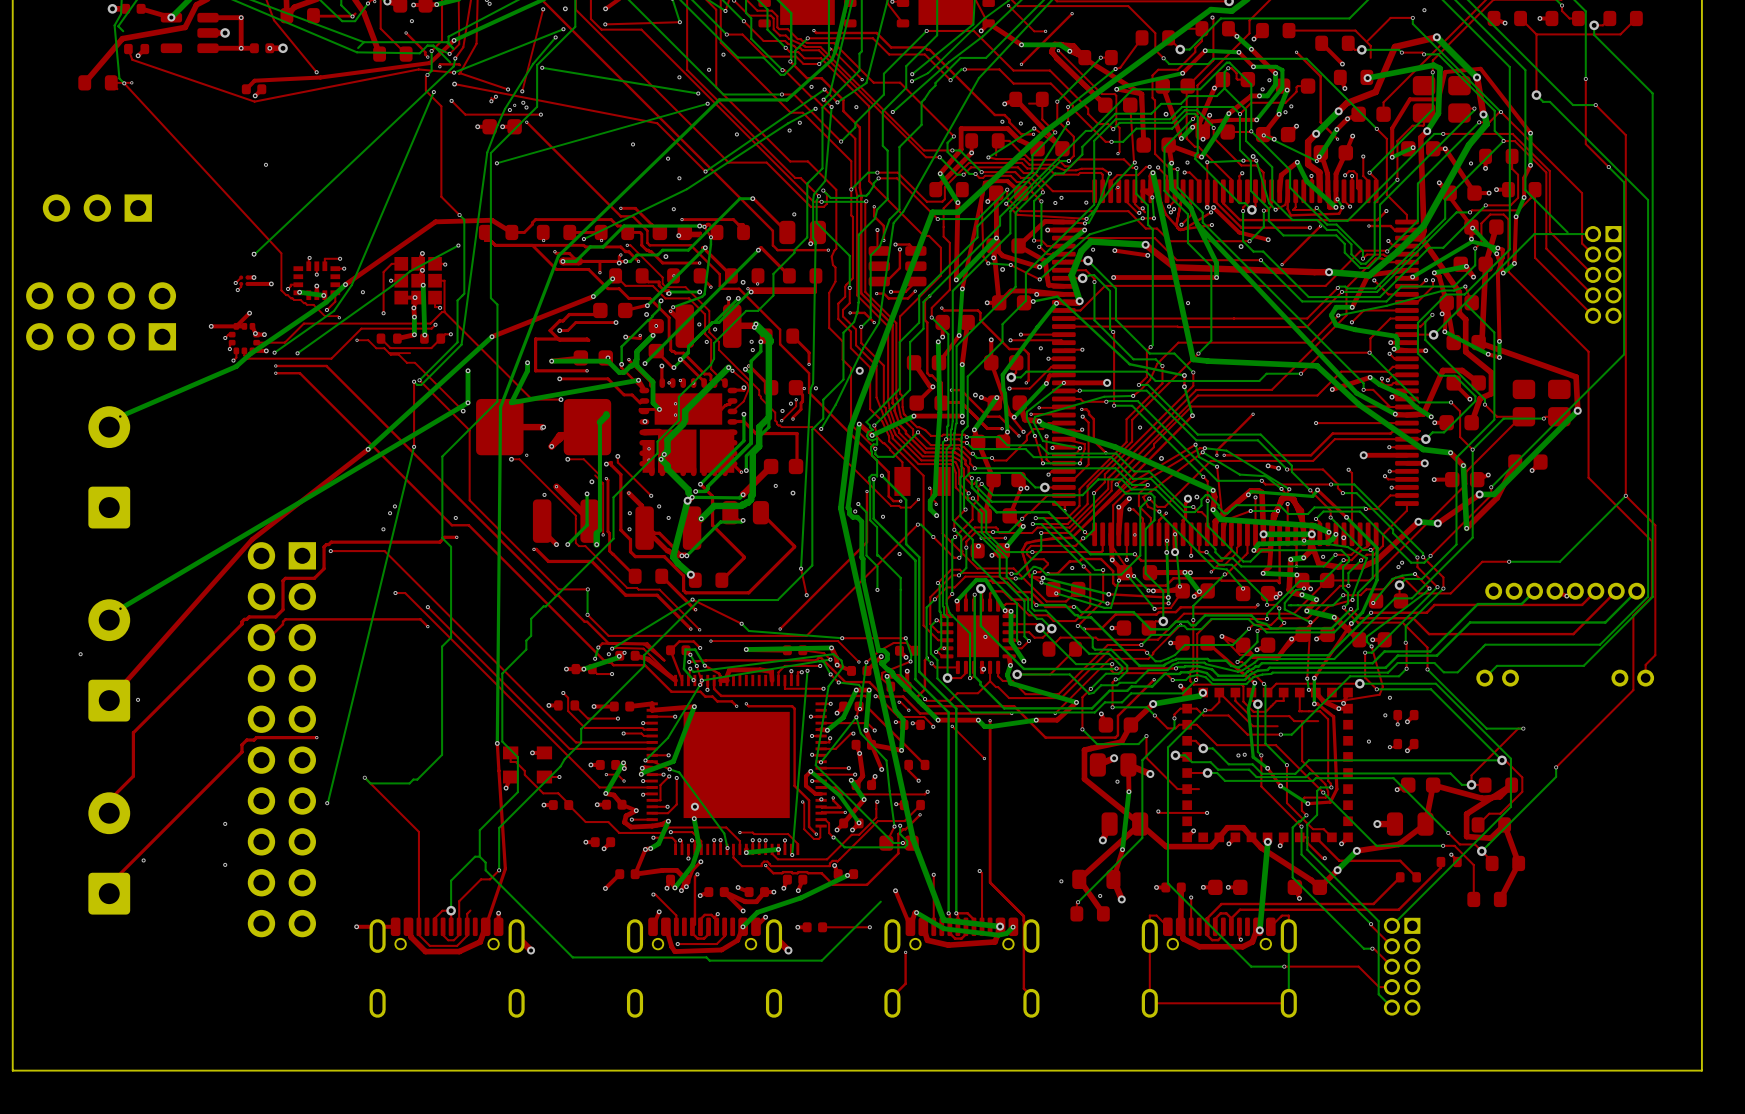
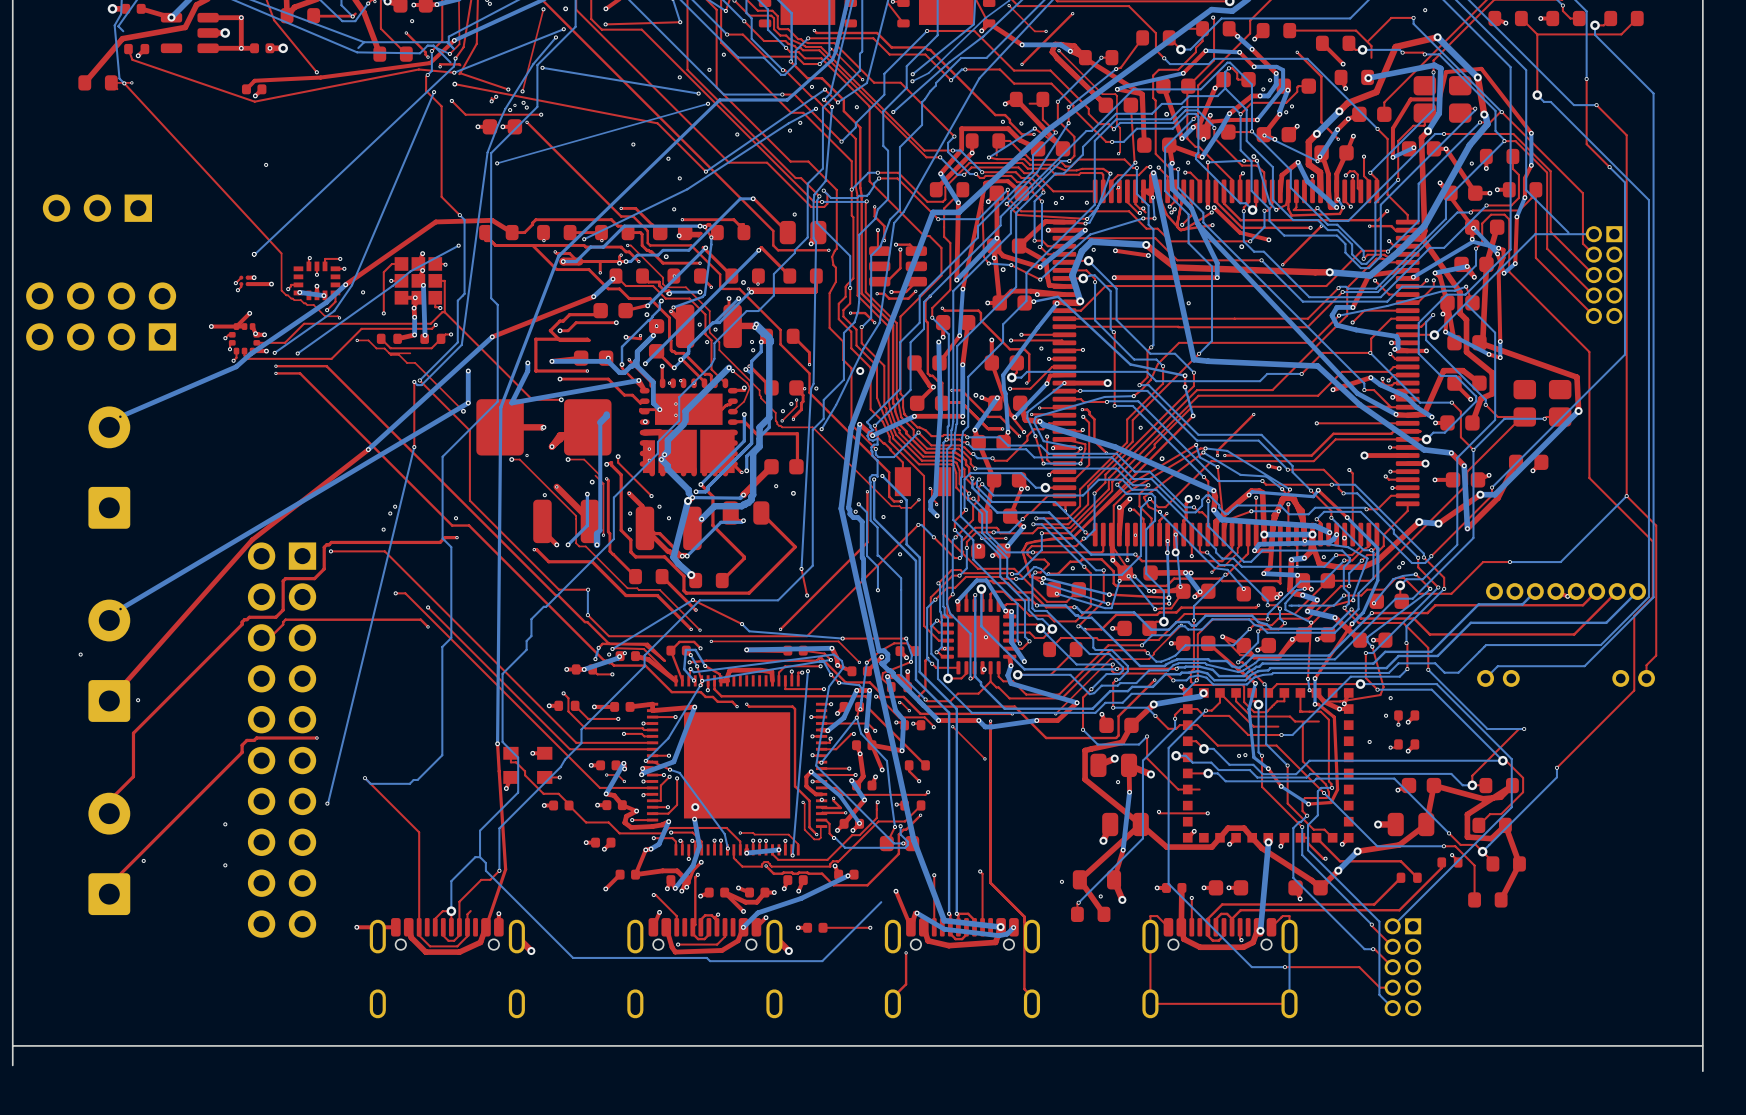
board edge: none -> (1702, 1045) (13, 1045)
board edge: (12, 1064) (12, 1070) (1701, 1070) -> none

